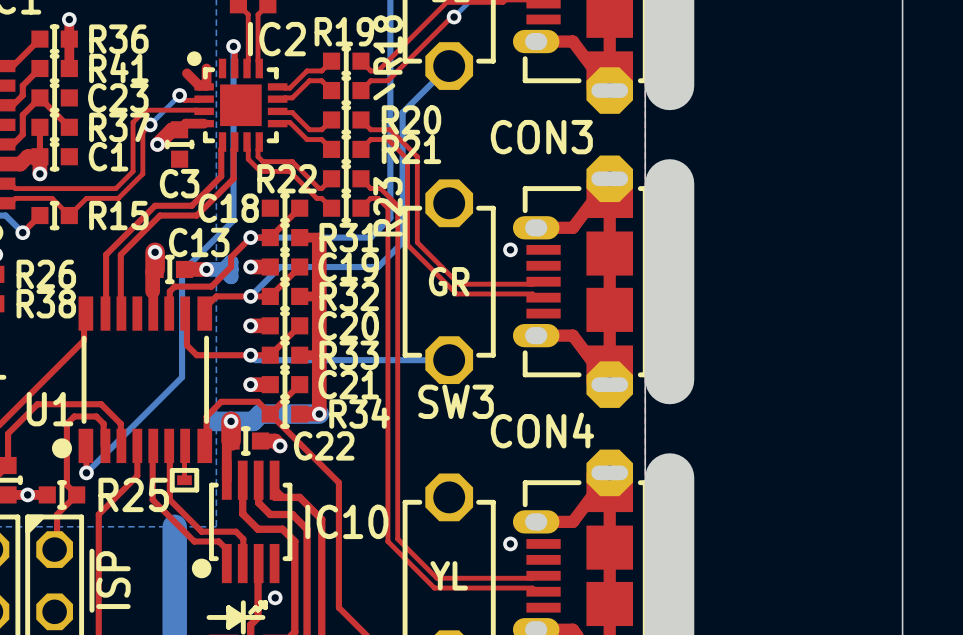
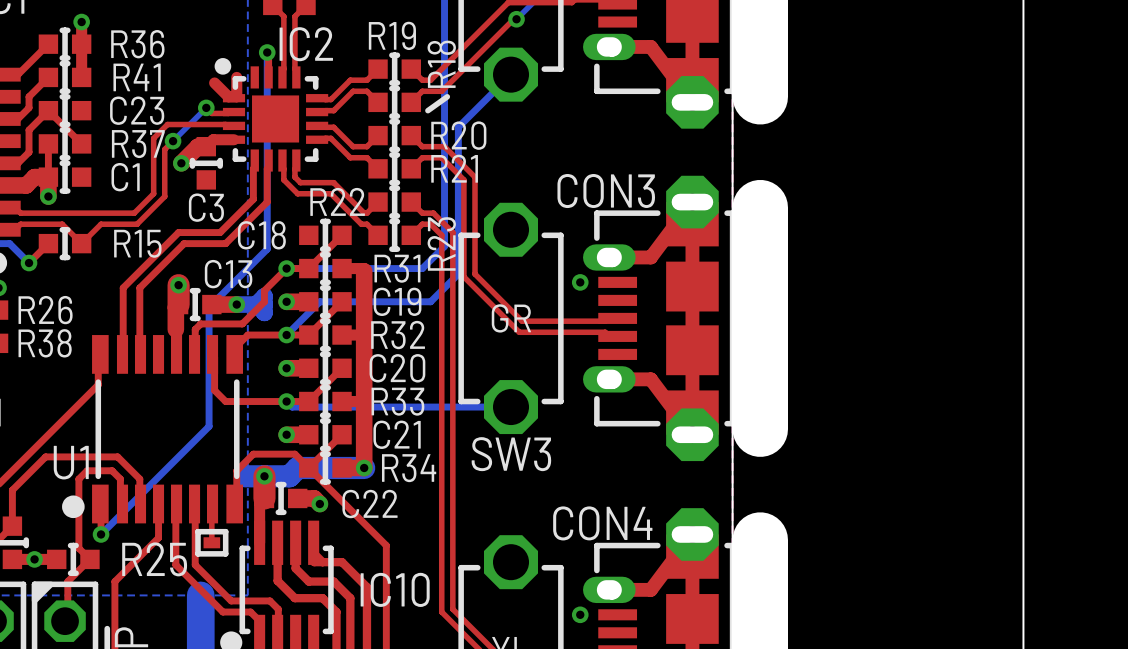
CON3 name position: CON3 (541, 137) -> CON3 (606, 191)
CON4 name position: CON4 (542, 430) -> CON4 (602, 523)

